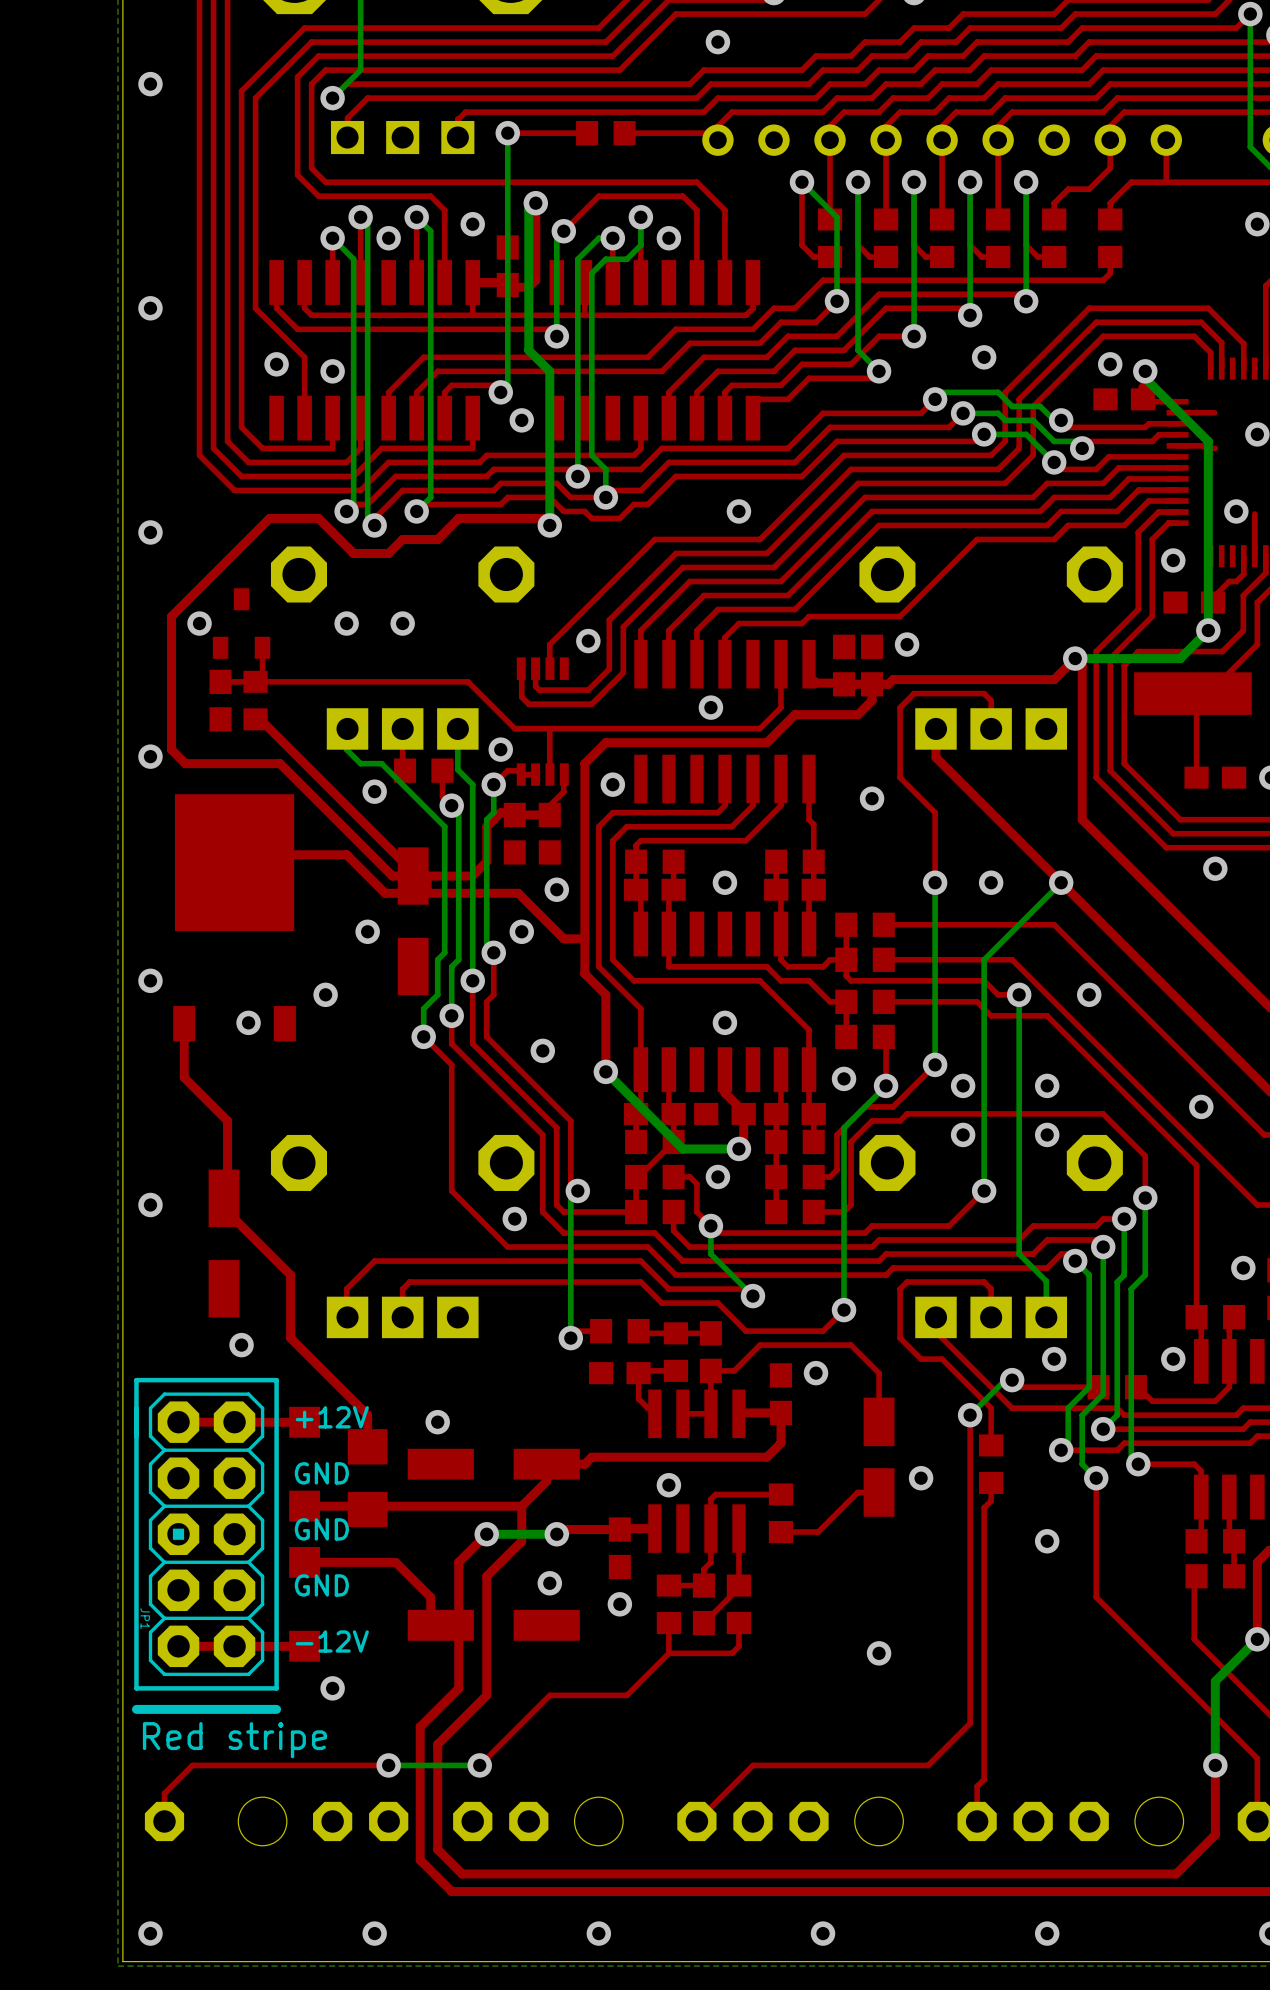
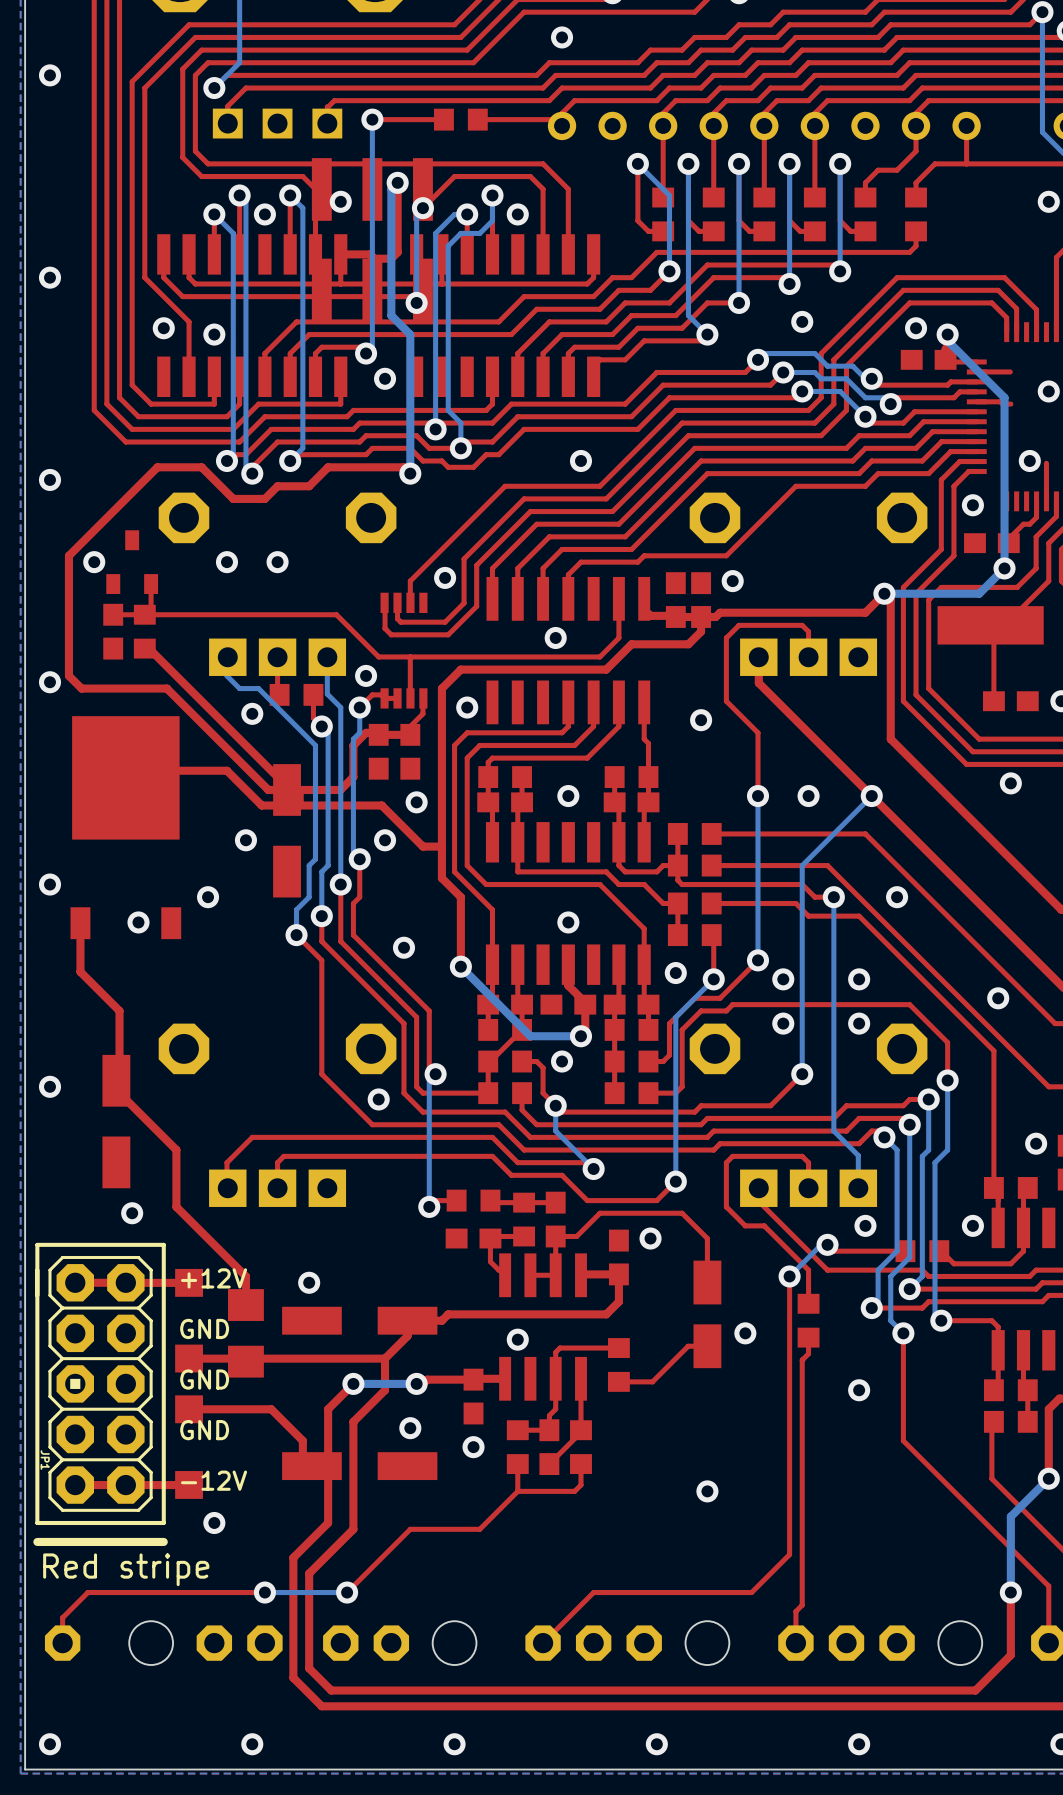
part footprint: [496, 235, 519, 298] -> [311, 158, 433, 322]

